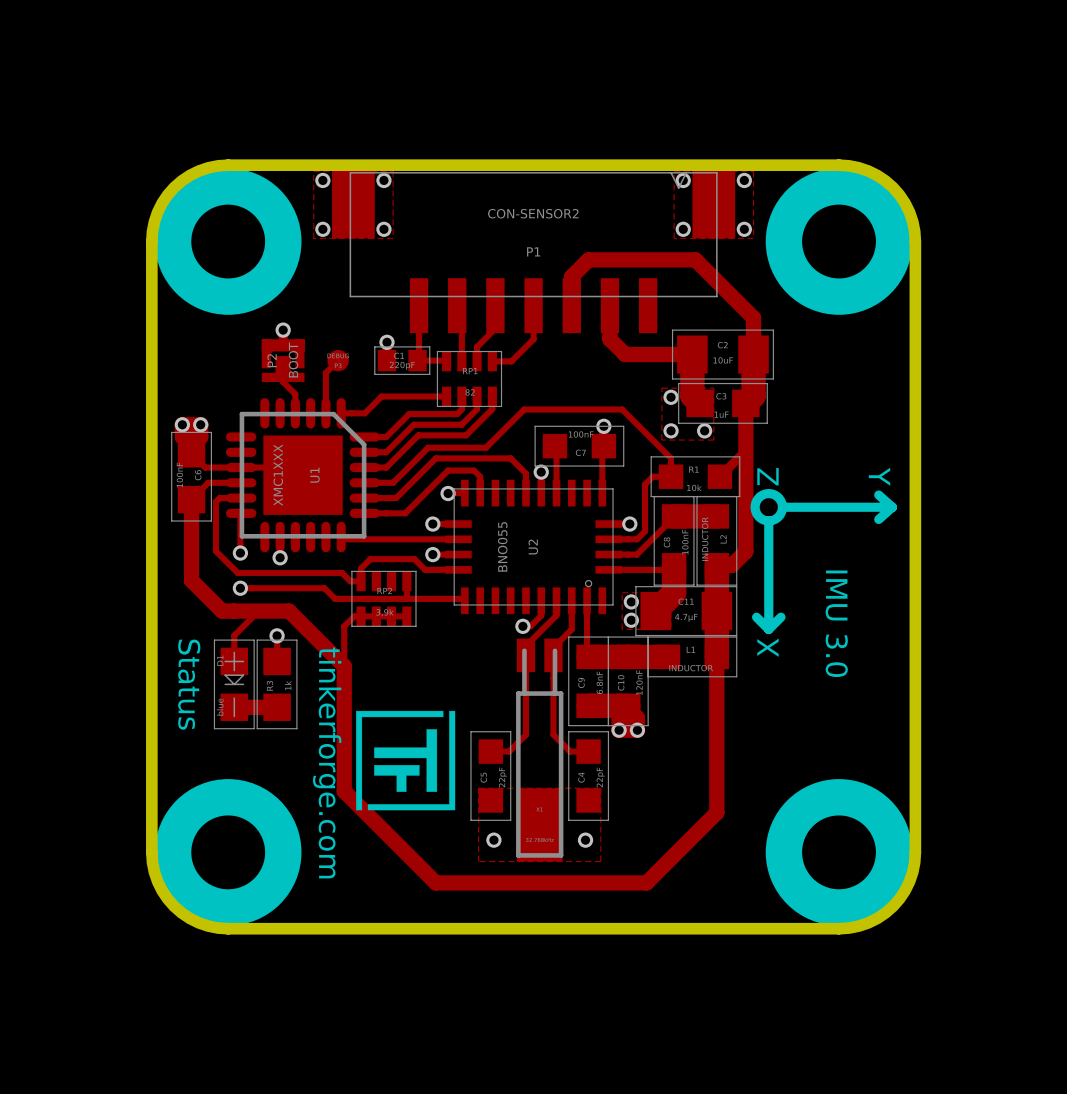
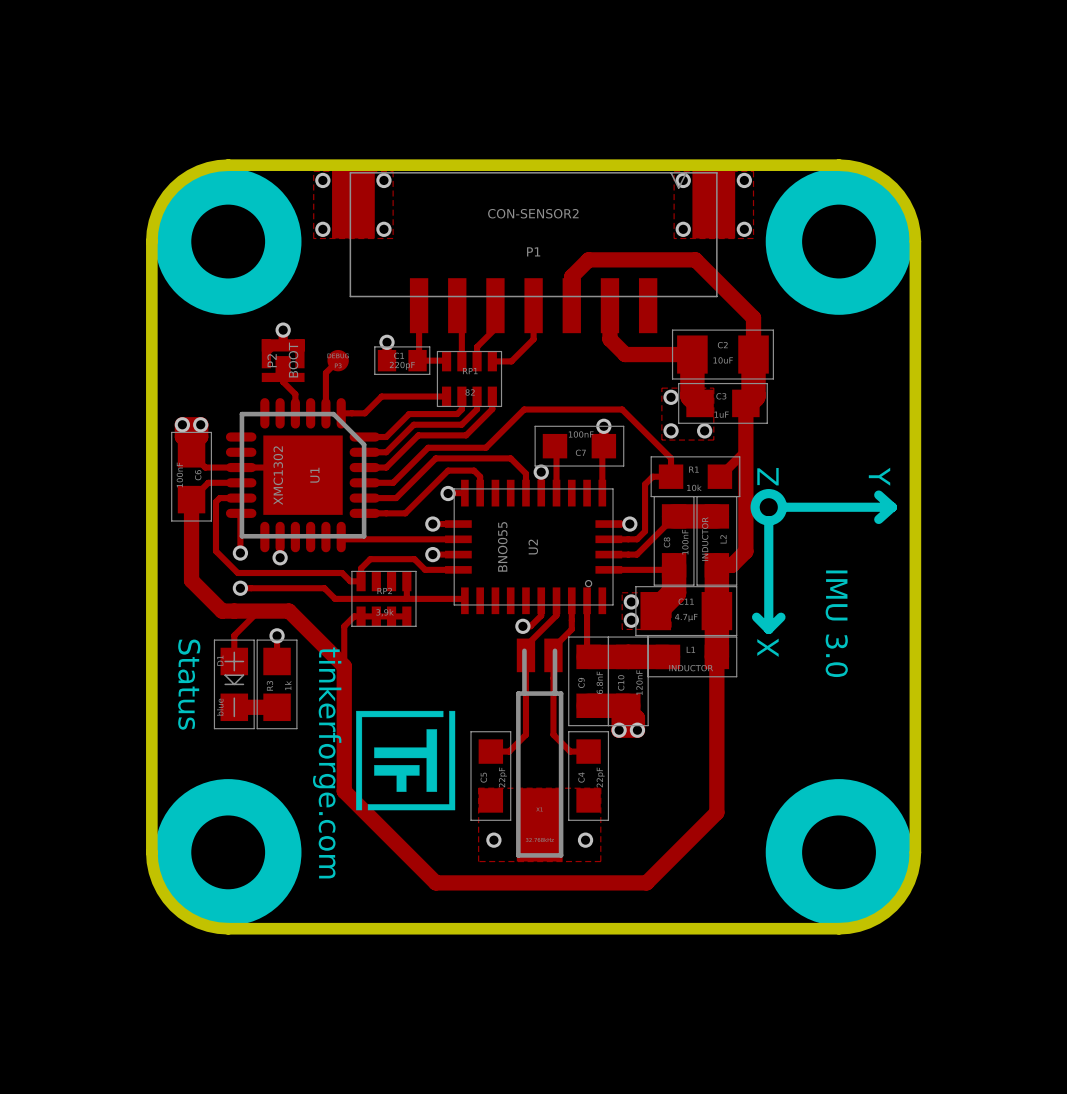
U1 value: XMC1XXX (278, 475) -> XMC1302 (278, 475)

